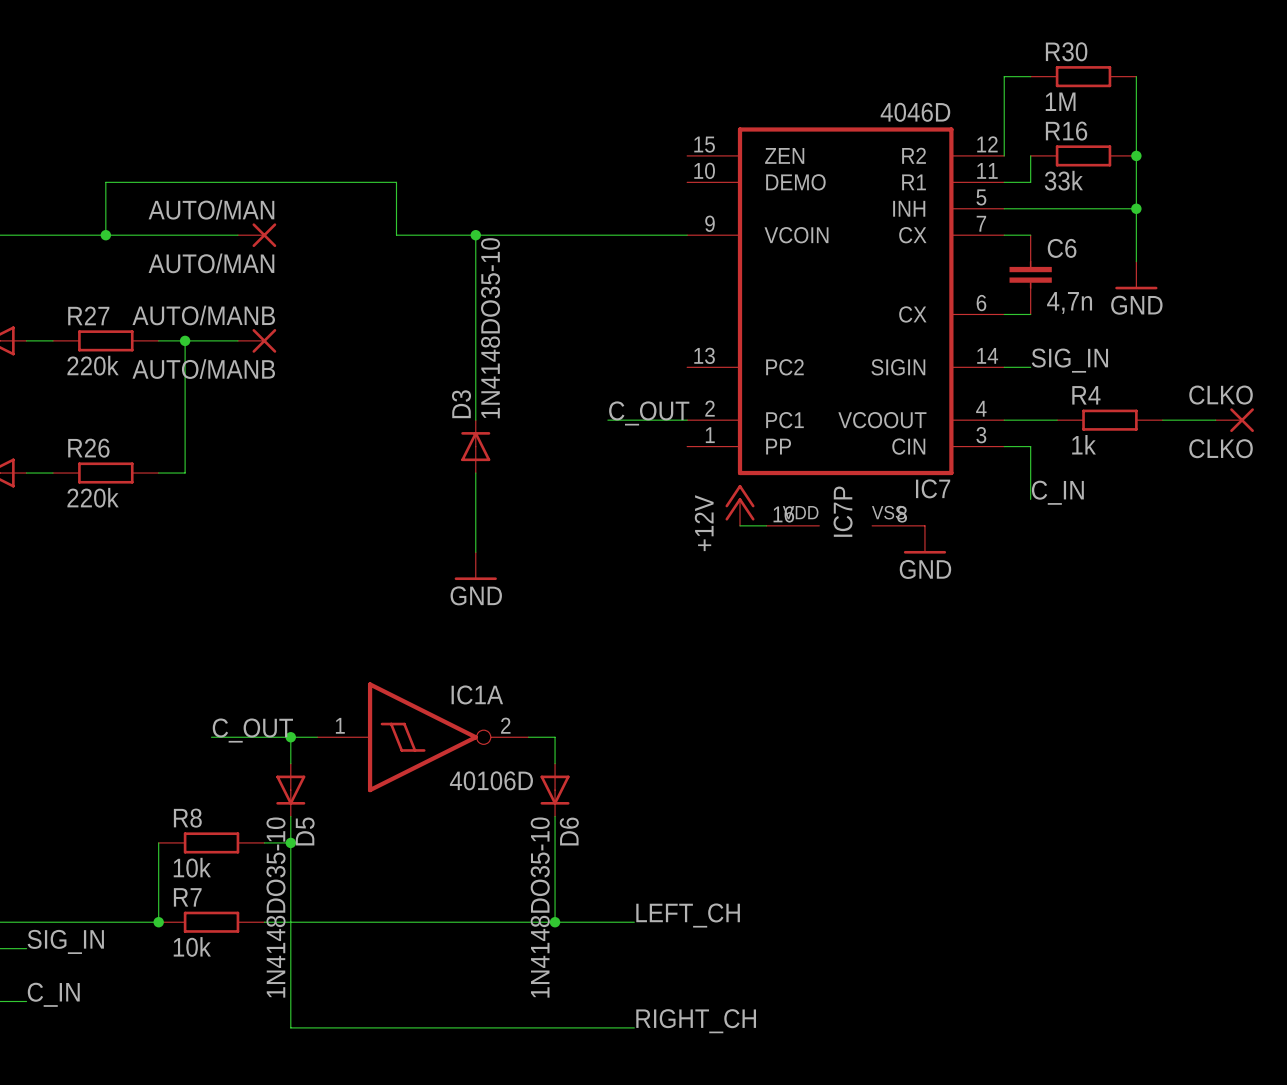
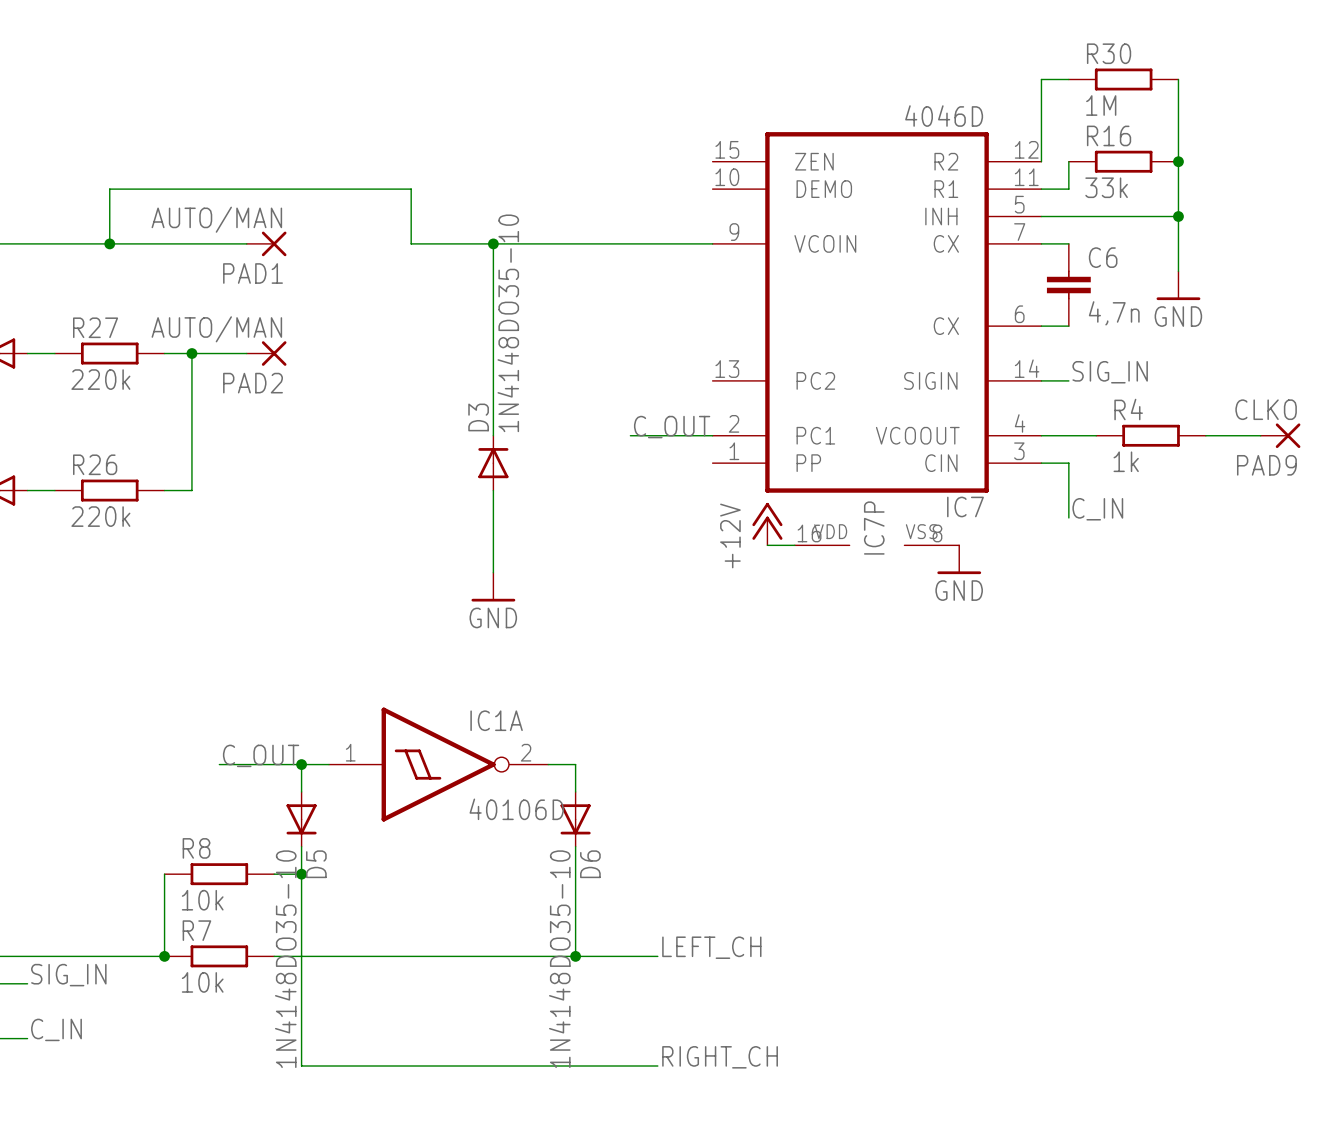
AUTO/MAN name: AUTO/MAN (211, 263) -> PAD1 (253, 273)
AUTO/MANB value: AUTO/MANB (203, 315) -> AUTO/MAN (216, 329)
AUTO/MANB name: AUTO/MANB (203, 369) -> PAD2 (253, 383)
CLKO name: CLKO (1221, 448) -> PAD9 (1266, 465)

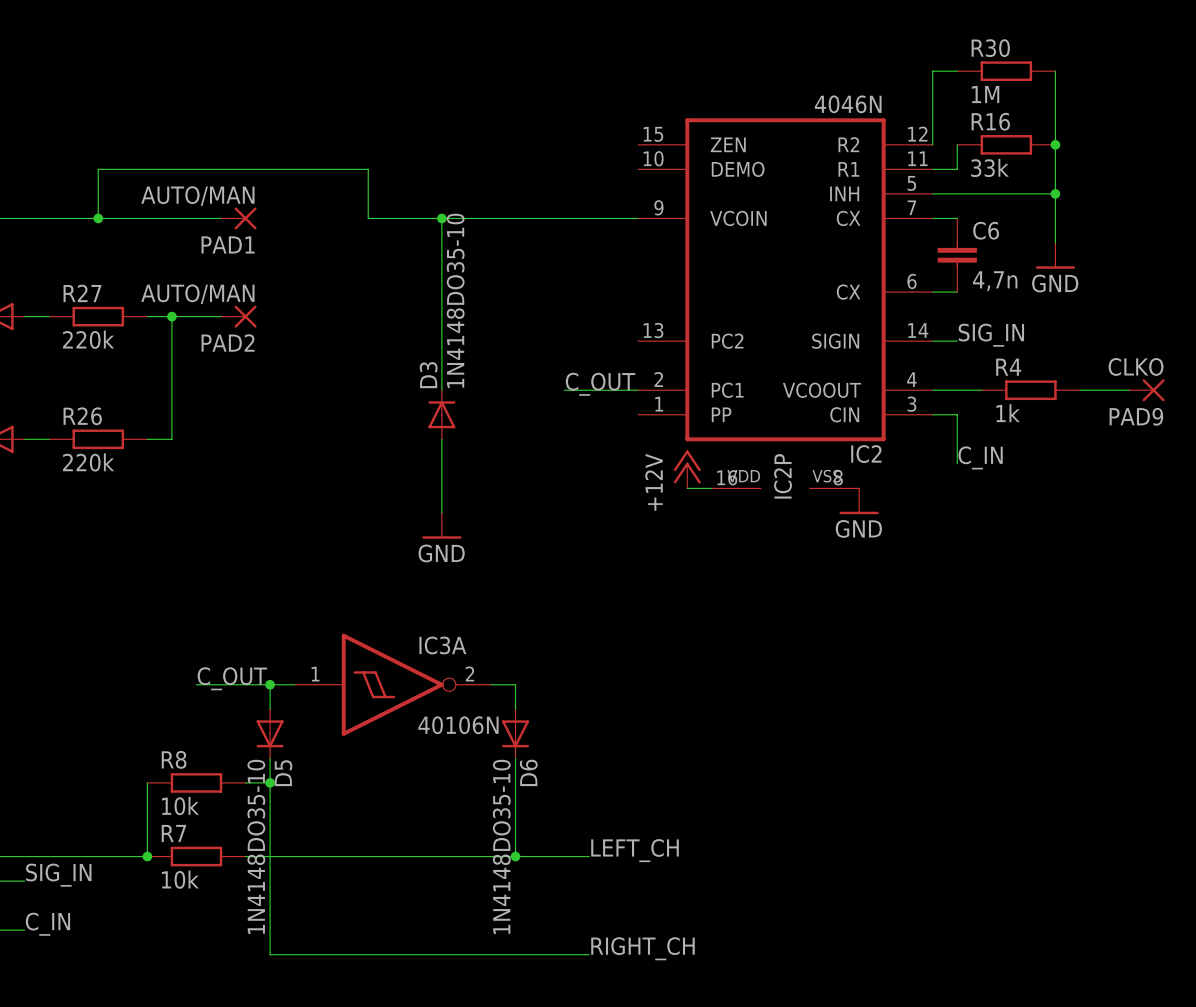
IC7 value: 4046D (944, 116) -> 4046N (848, 104)
IC7 name: IC7 (965, 506) -> IC2 (866, 454)
IC7P name: IC7P (874, 528) -> IC2P (783, 476)
IC1A name: IC1A (496, 720) -> IC3A (442, 645)
IC1A value: 40106D (516, 809) -> 40106N (458, 725)

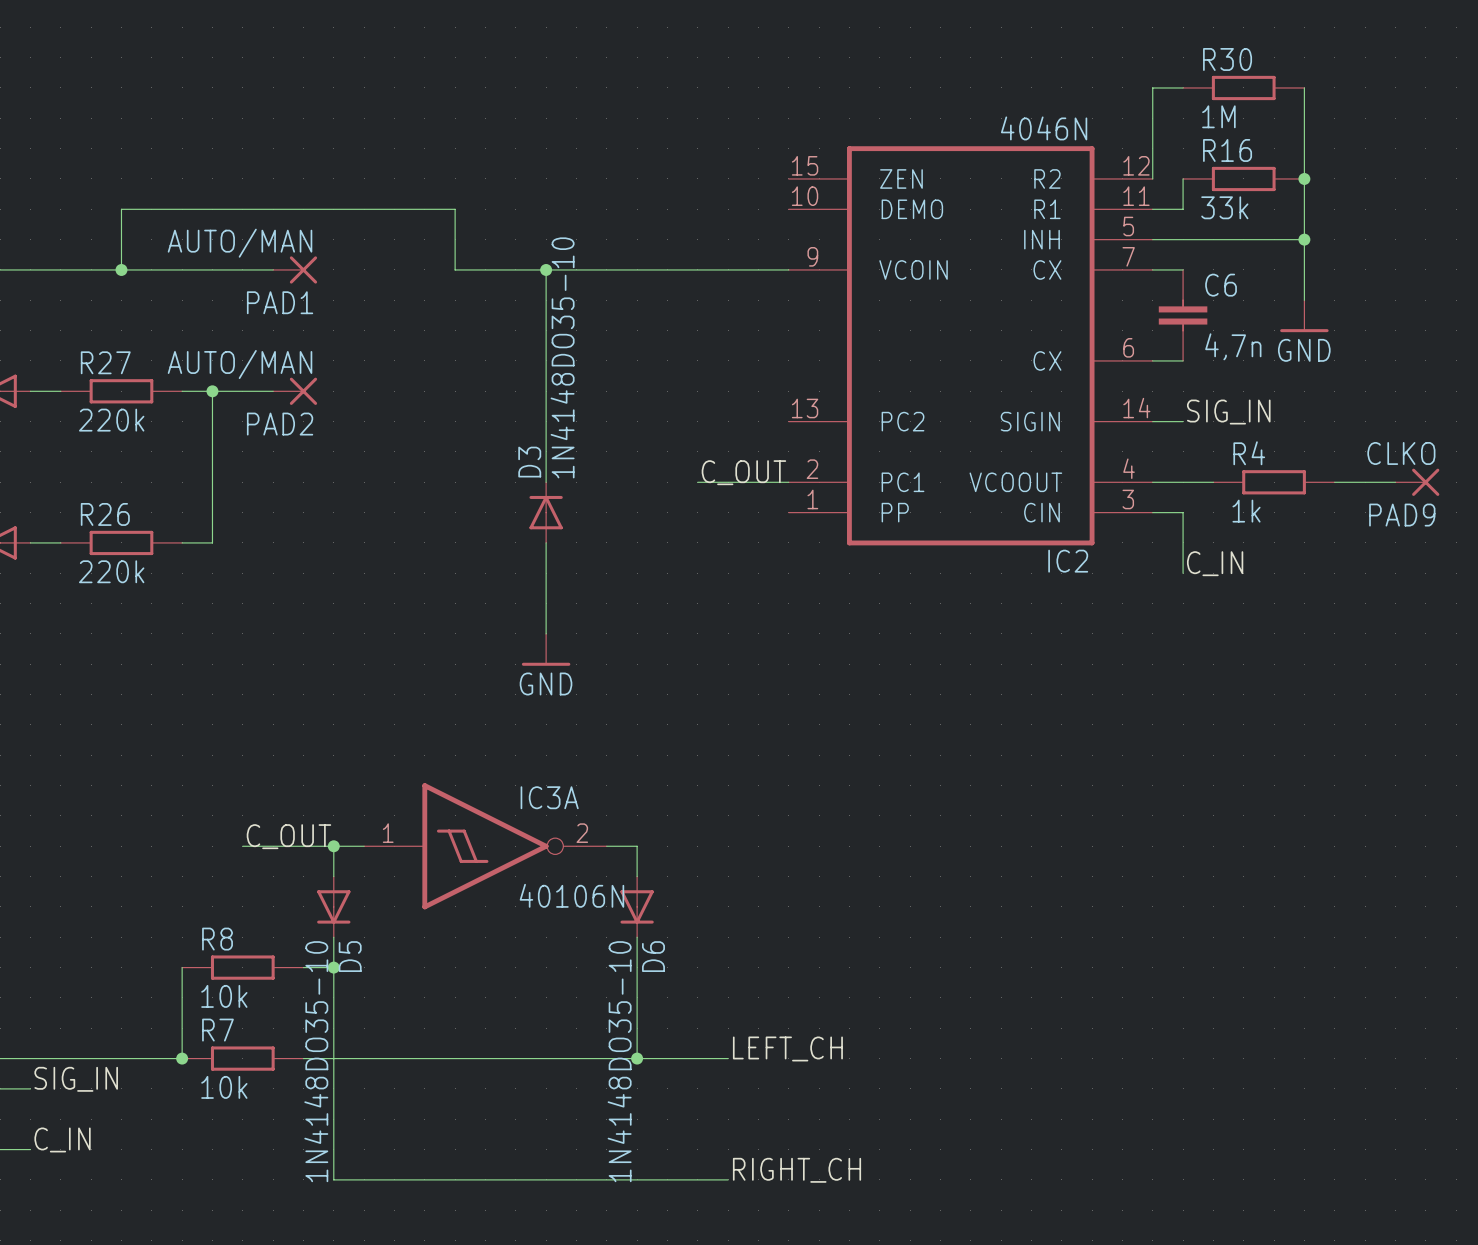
power symbol: +12V (687, 469) -> none
wire: (687, 488) (711, 488) -> none
IC2P: (785, 488) -> none
power symbol: GND (859, 501) -> none

